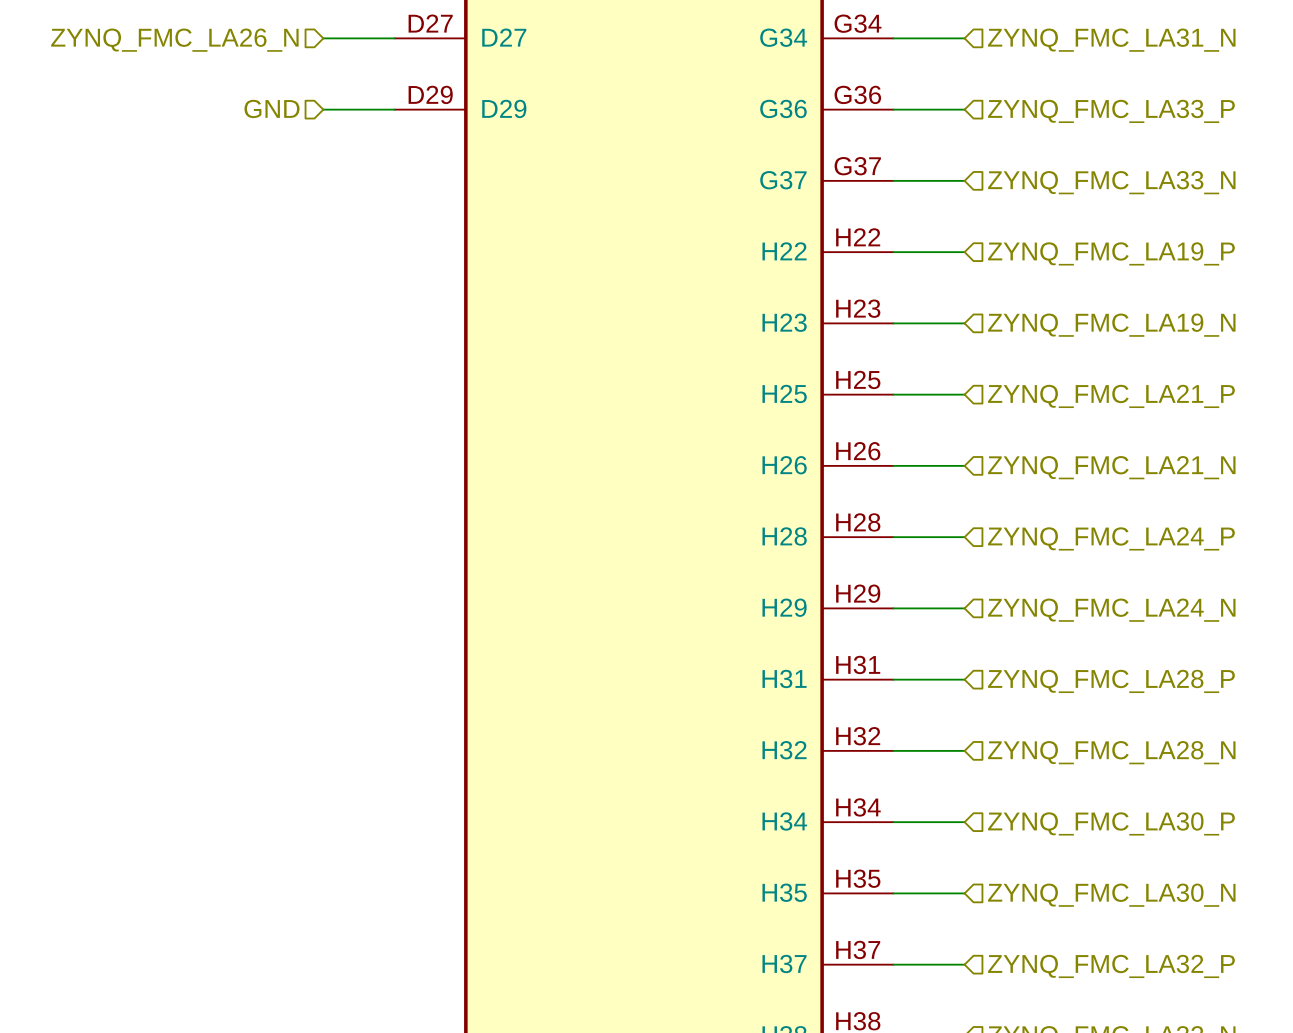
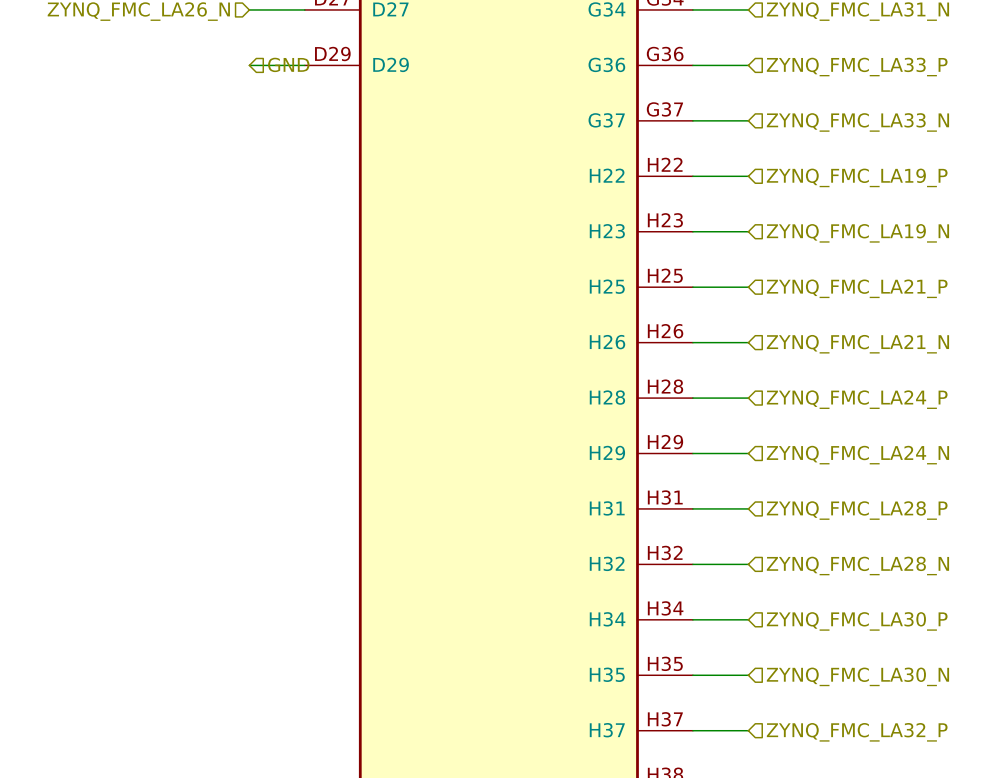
hierarchical label rotation: 0° (271, 108) -> 180° (288, 64)
hierarchical label position: GND (271, 108) -> GND (288, 64)

